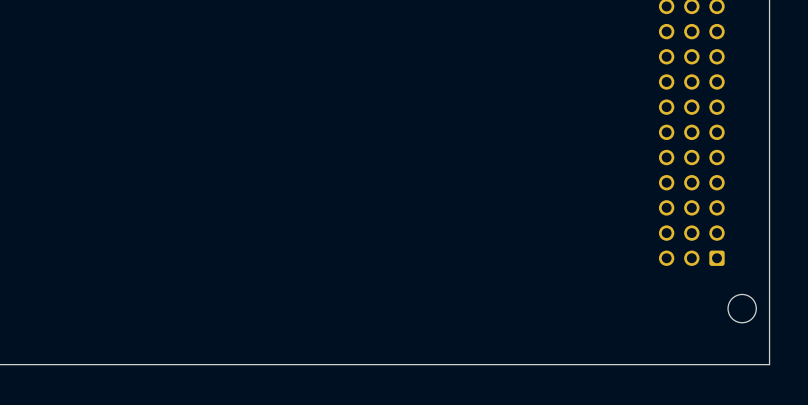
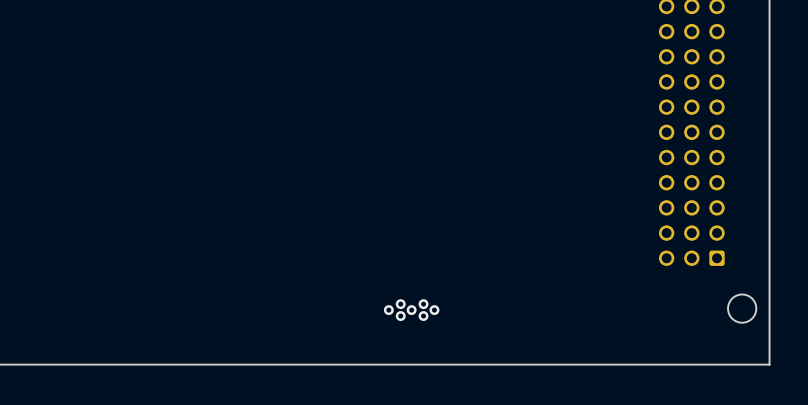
via: none -> (400, 304)
via: none -> (423, 304)
via: none -> (388, 310)
via: none -> (411, 310)
via: none -> (434, 310)
via: none -> (400, 316)
via: none -> (423, 316)

